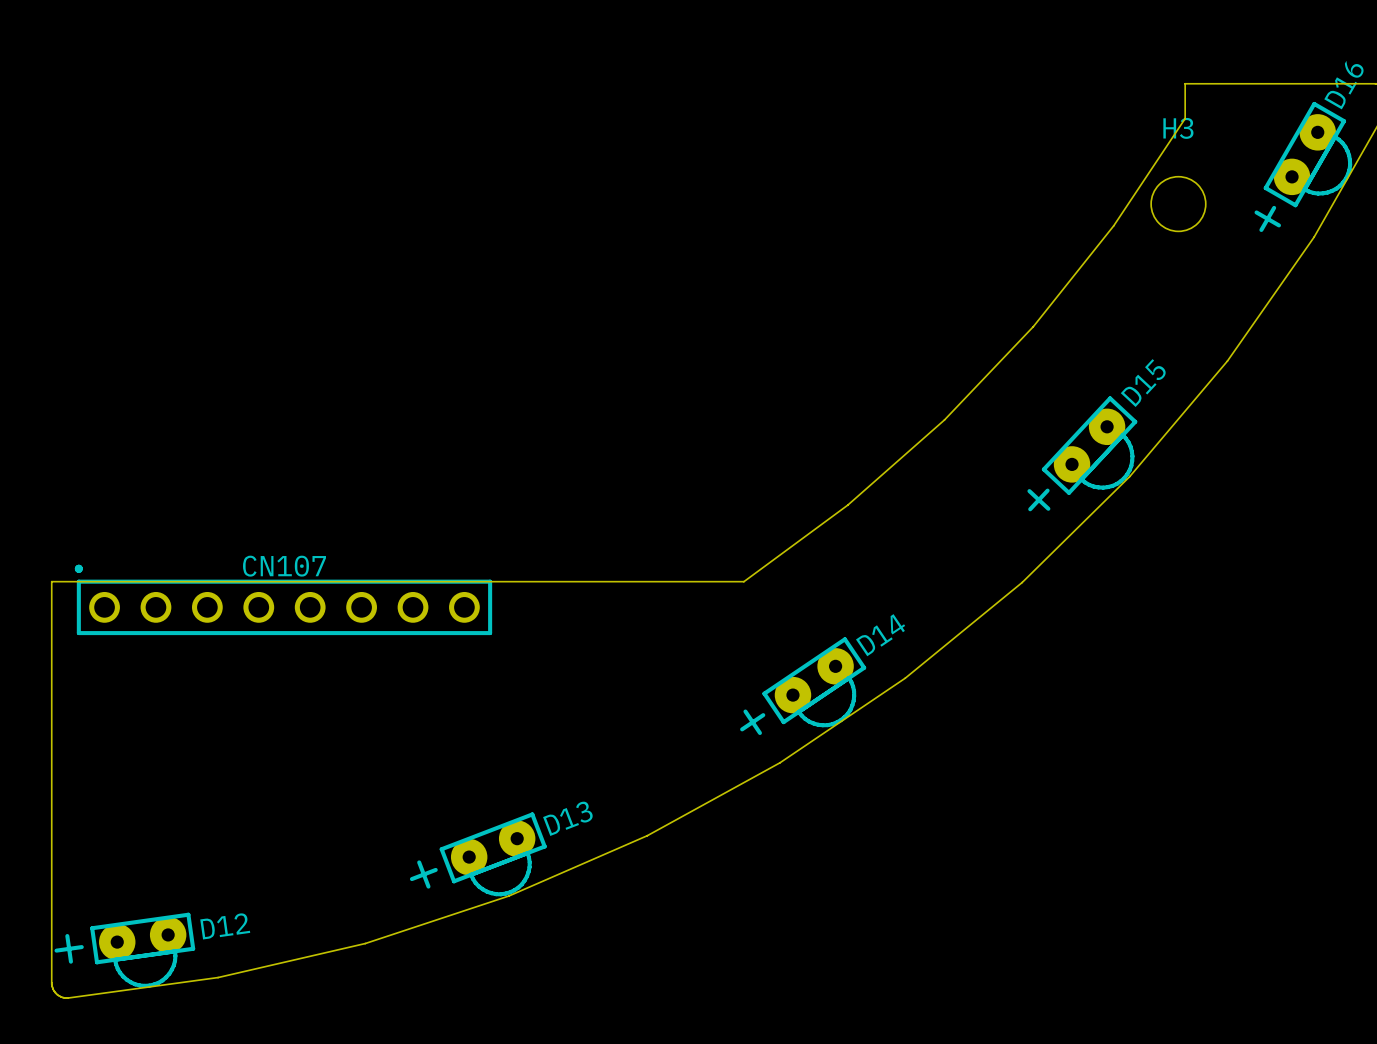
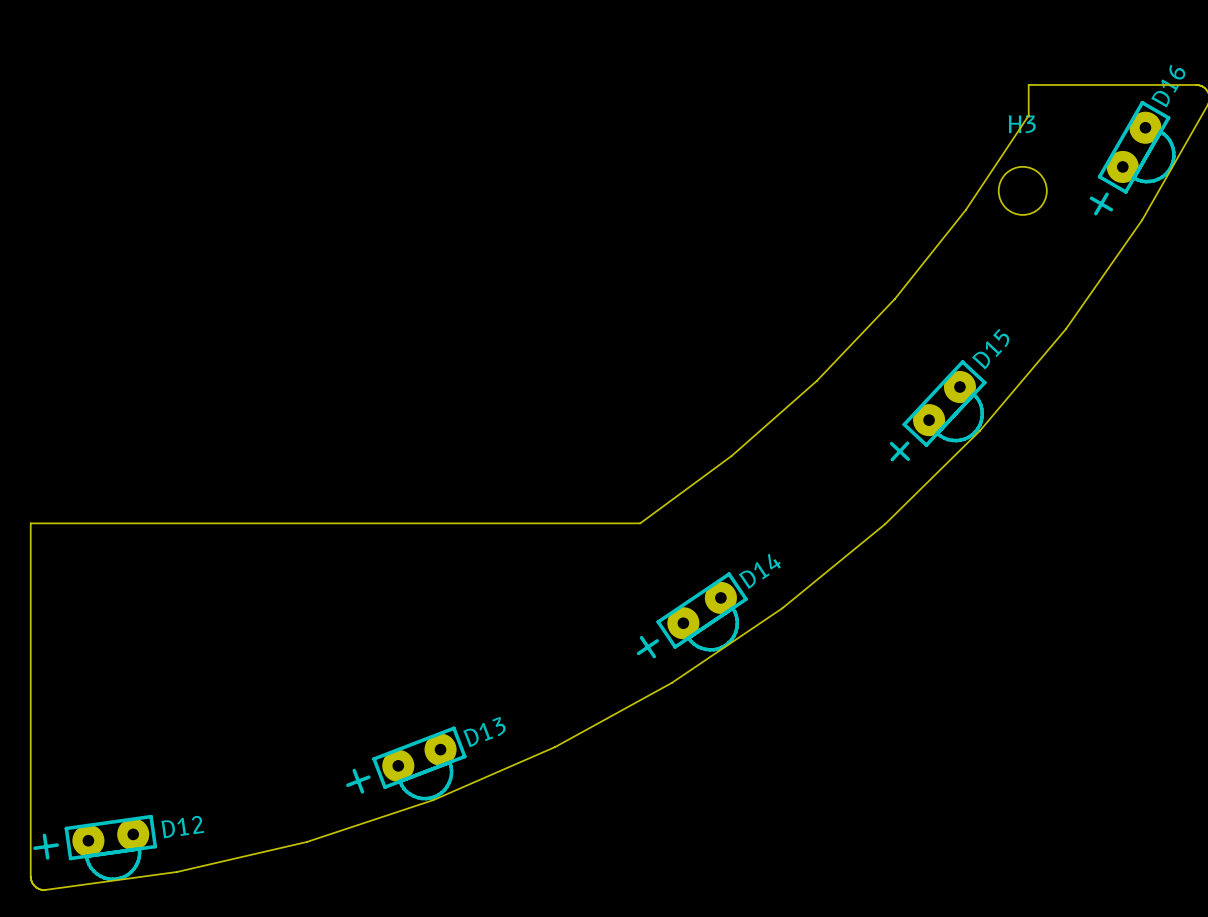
CN107: (283, 599) -> none

